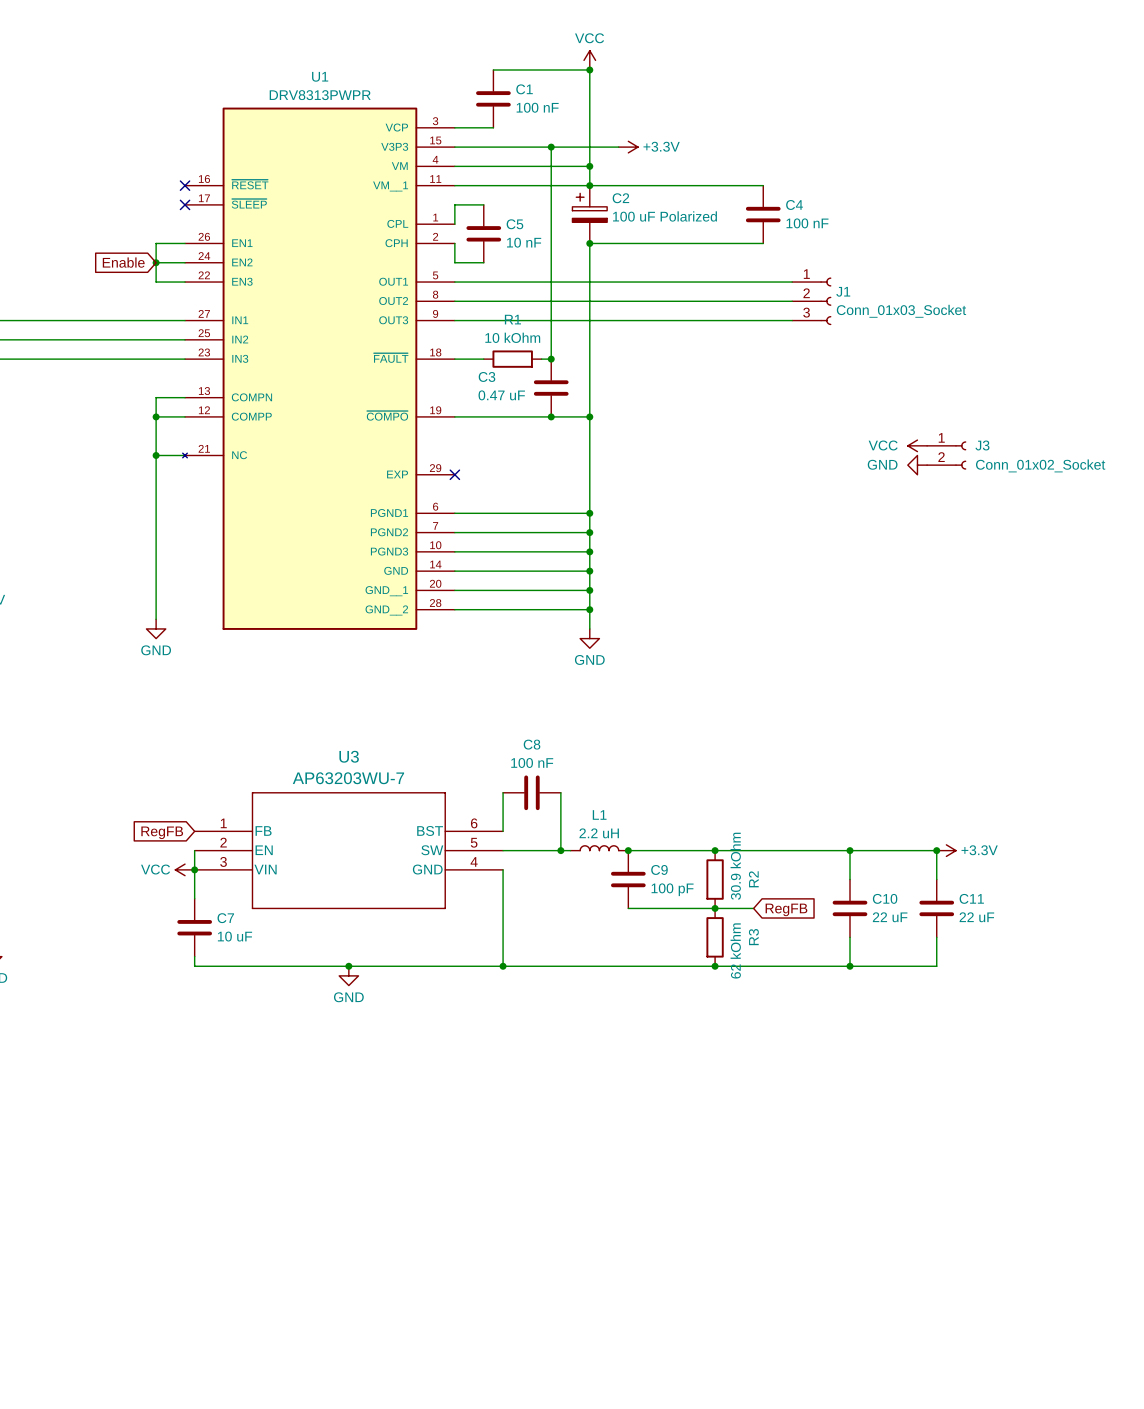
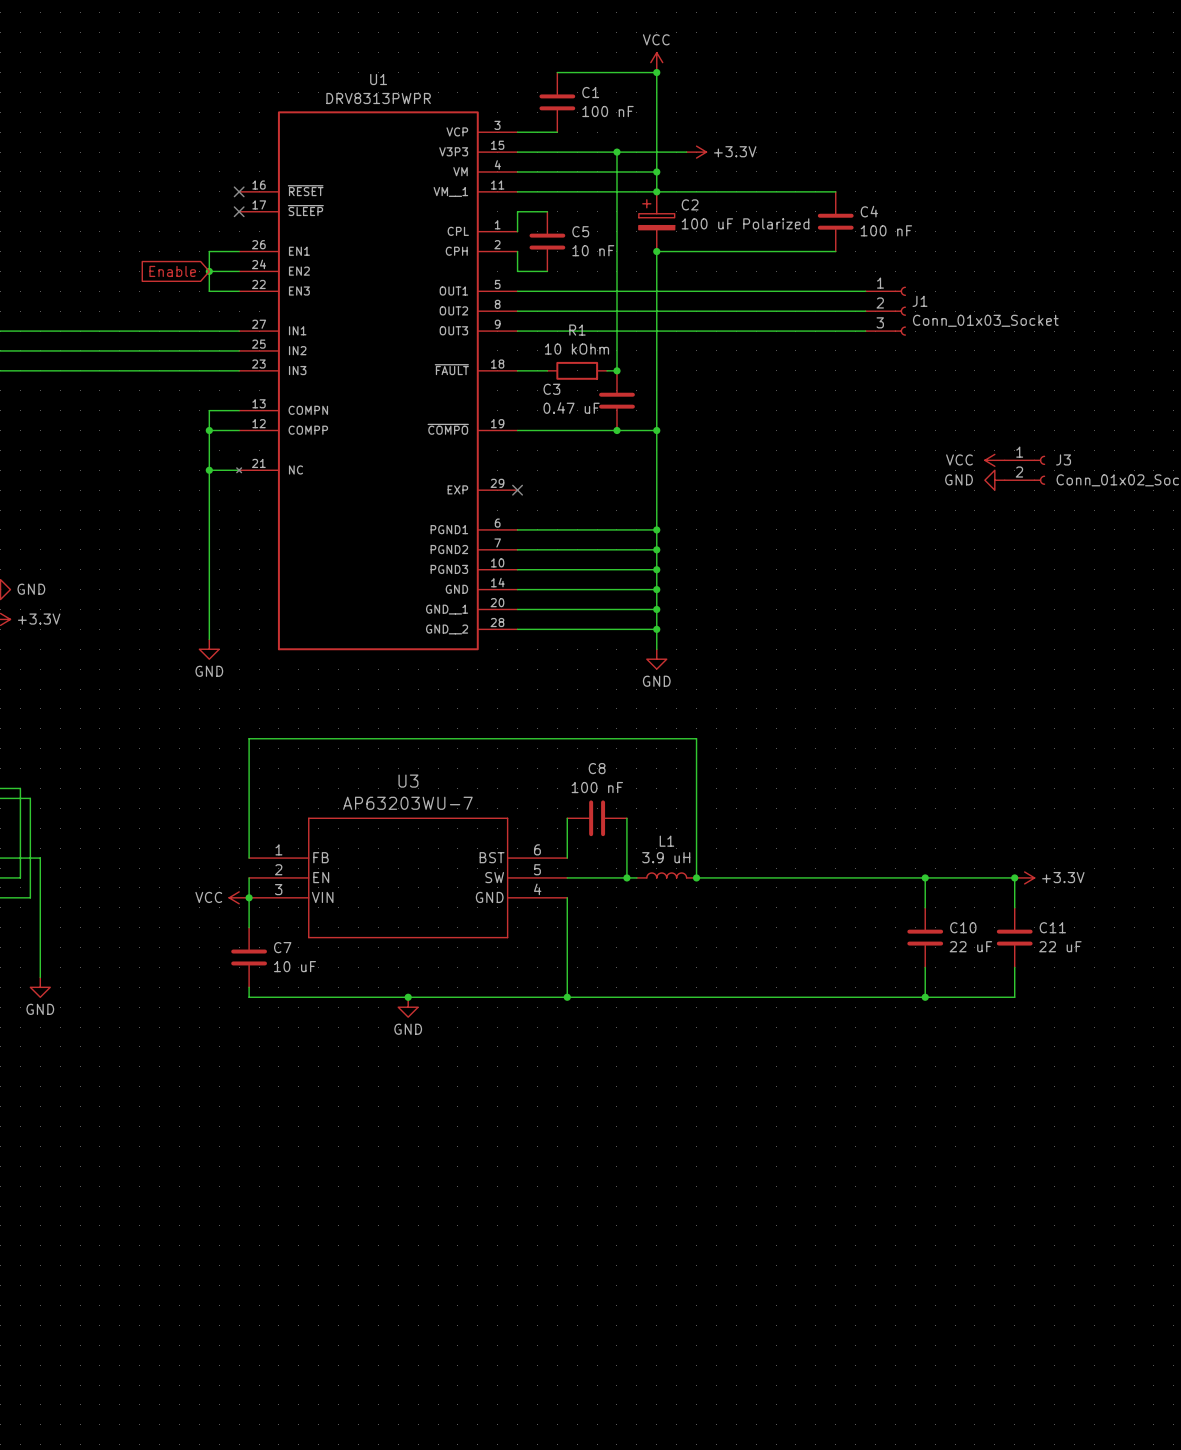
wire: none -> (249, 858) (249, 738) (696, 738) (696, 877)
global label: RegFB (162, 832) -> none
L1 value: 2.2 uH (599, 833) -> 3.9 uH (666, 857)
junction: (715, 850) -> none
C9: 100 pF (628, 879) -> none
R2: 30.9 kOhm (715, 879) -> none
wire: (628, 908) (753, 908) -> none
junction: (715, 908) -> none
global label: RegFB (786, 909) -> none
R3: 62 kOhm (715, 937) -> none
junction: (715, 966) -> none

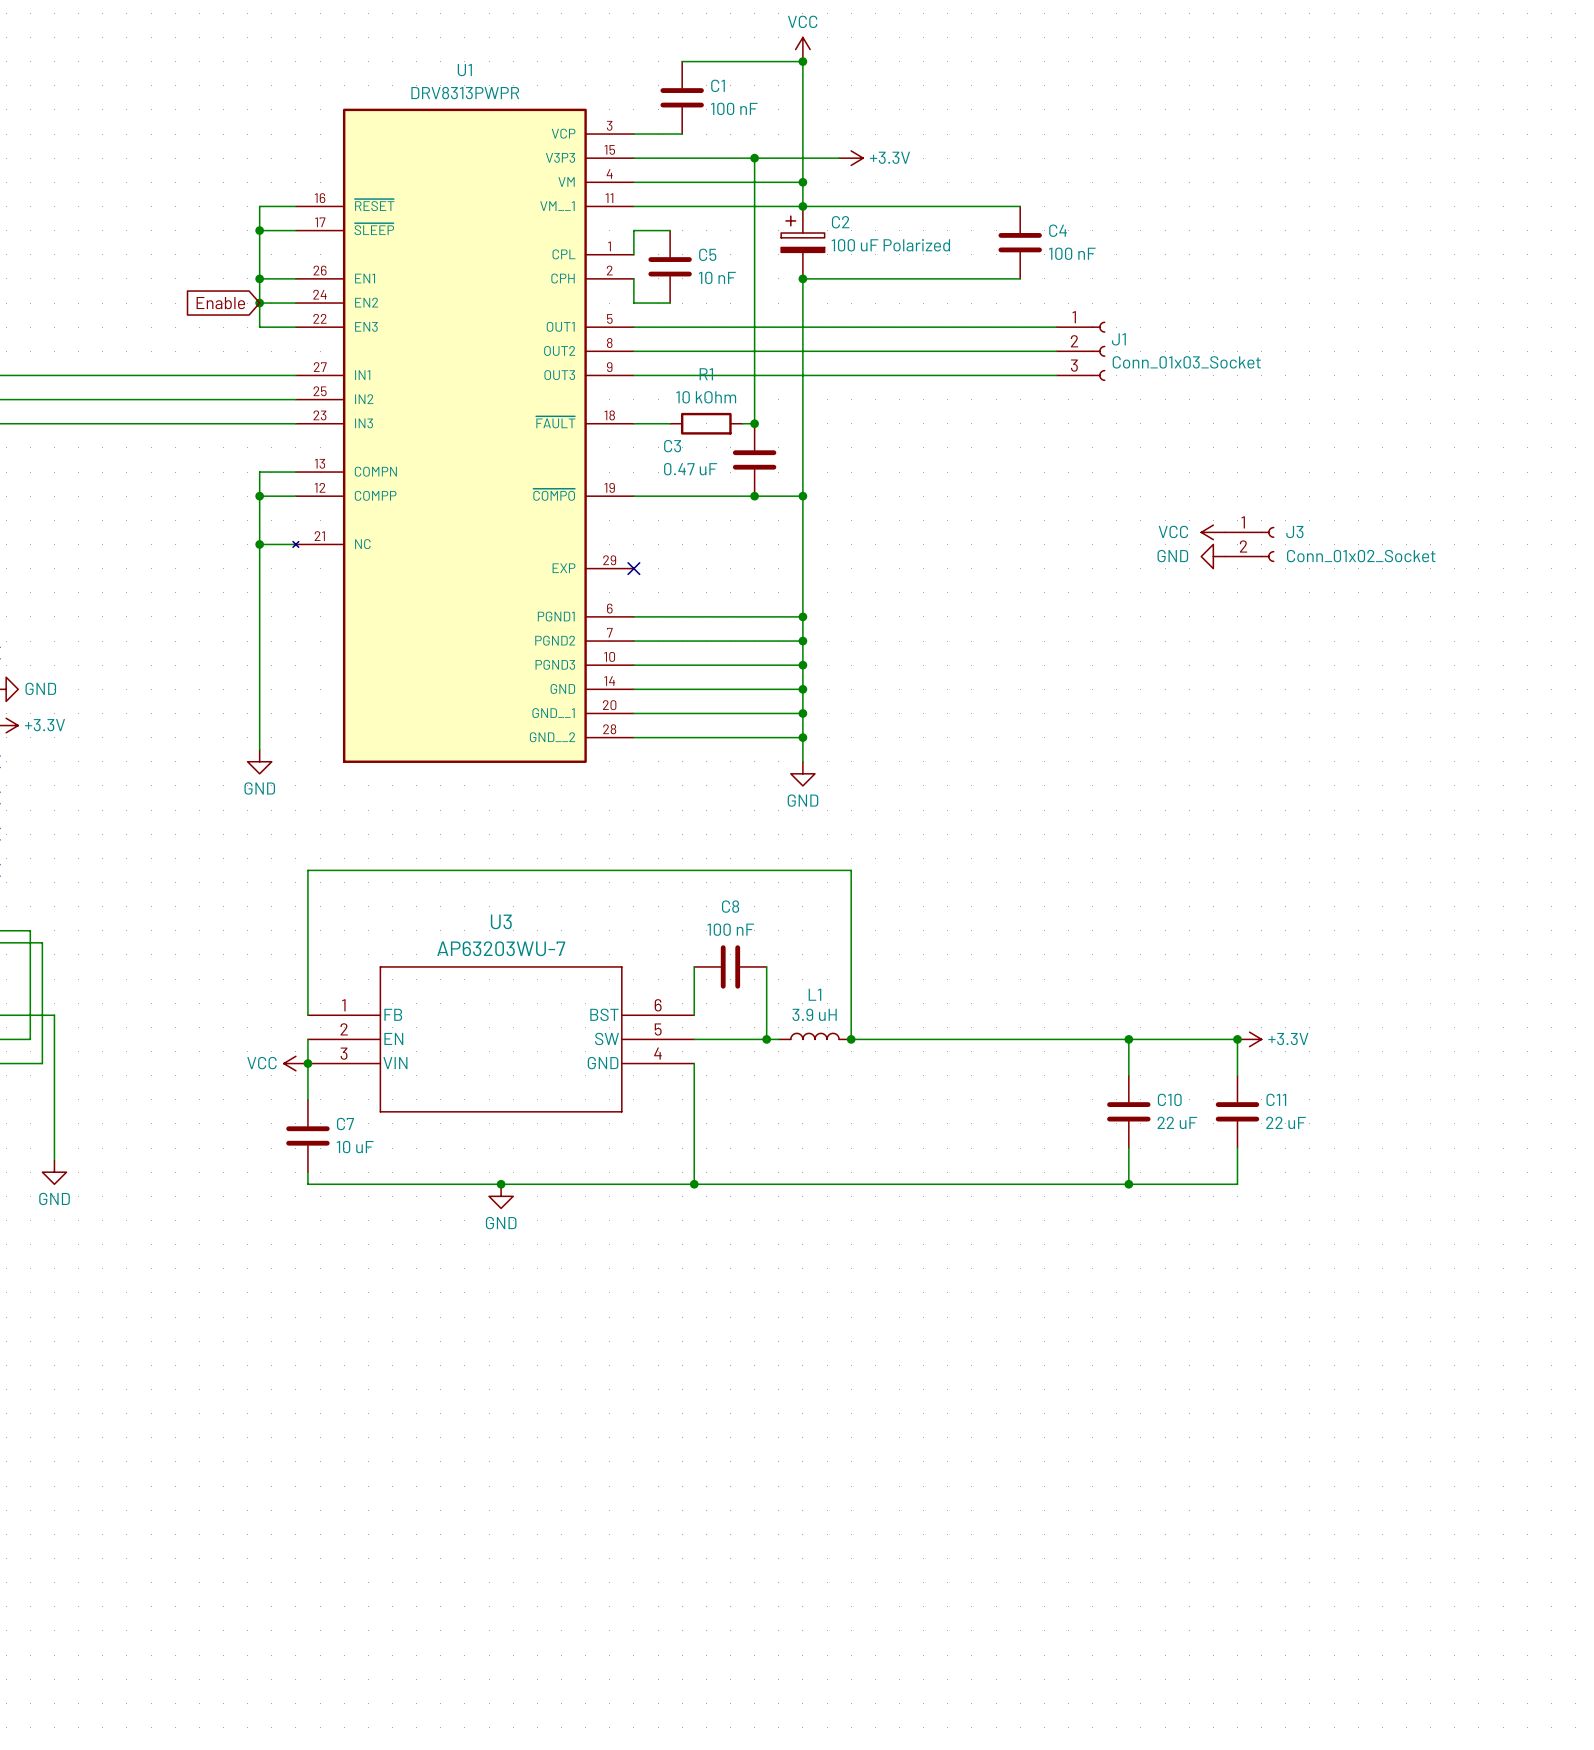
wire: none -> (295, 206) (259, 206) (259, 278)
no-connect mark: (239, 191) -> none
wire: none -> (259, 230) (295, 230)
junction: none -> (259, 230)
no-connect mark: (239, 211) -> none
junction: none -> (259, 278)

